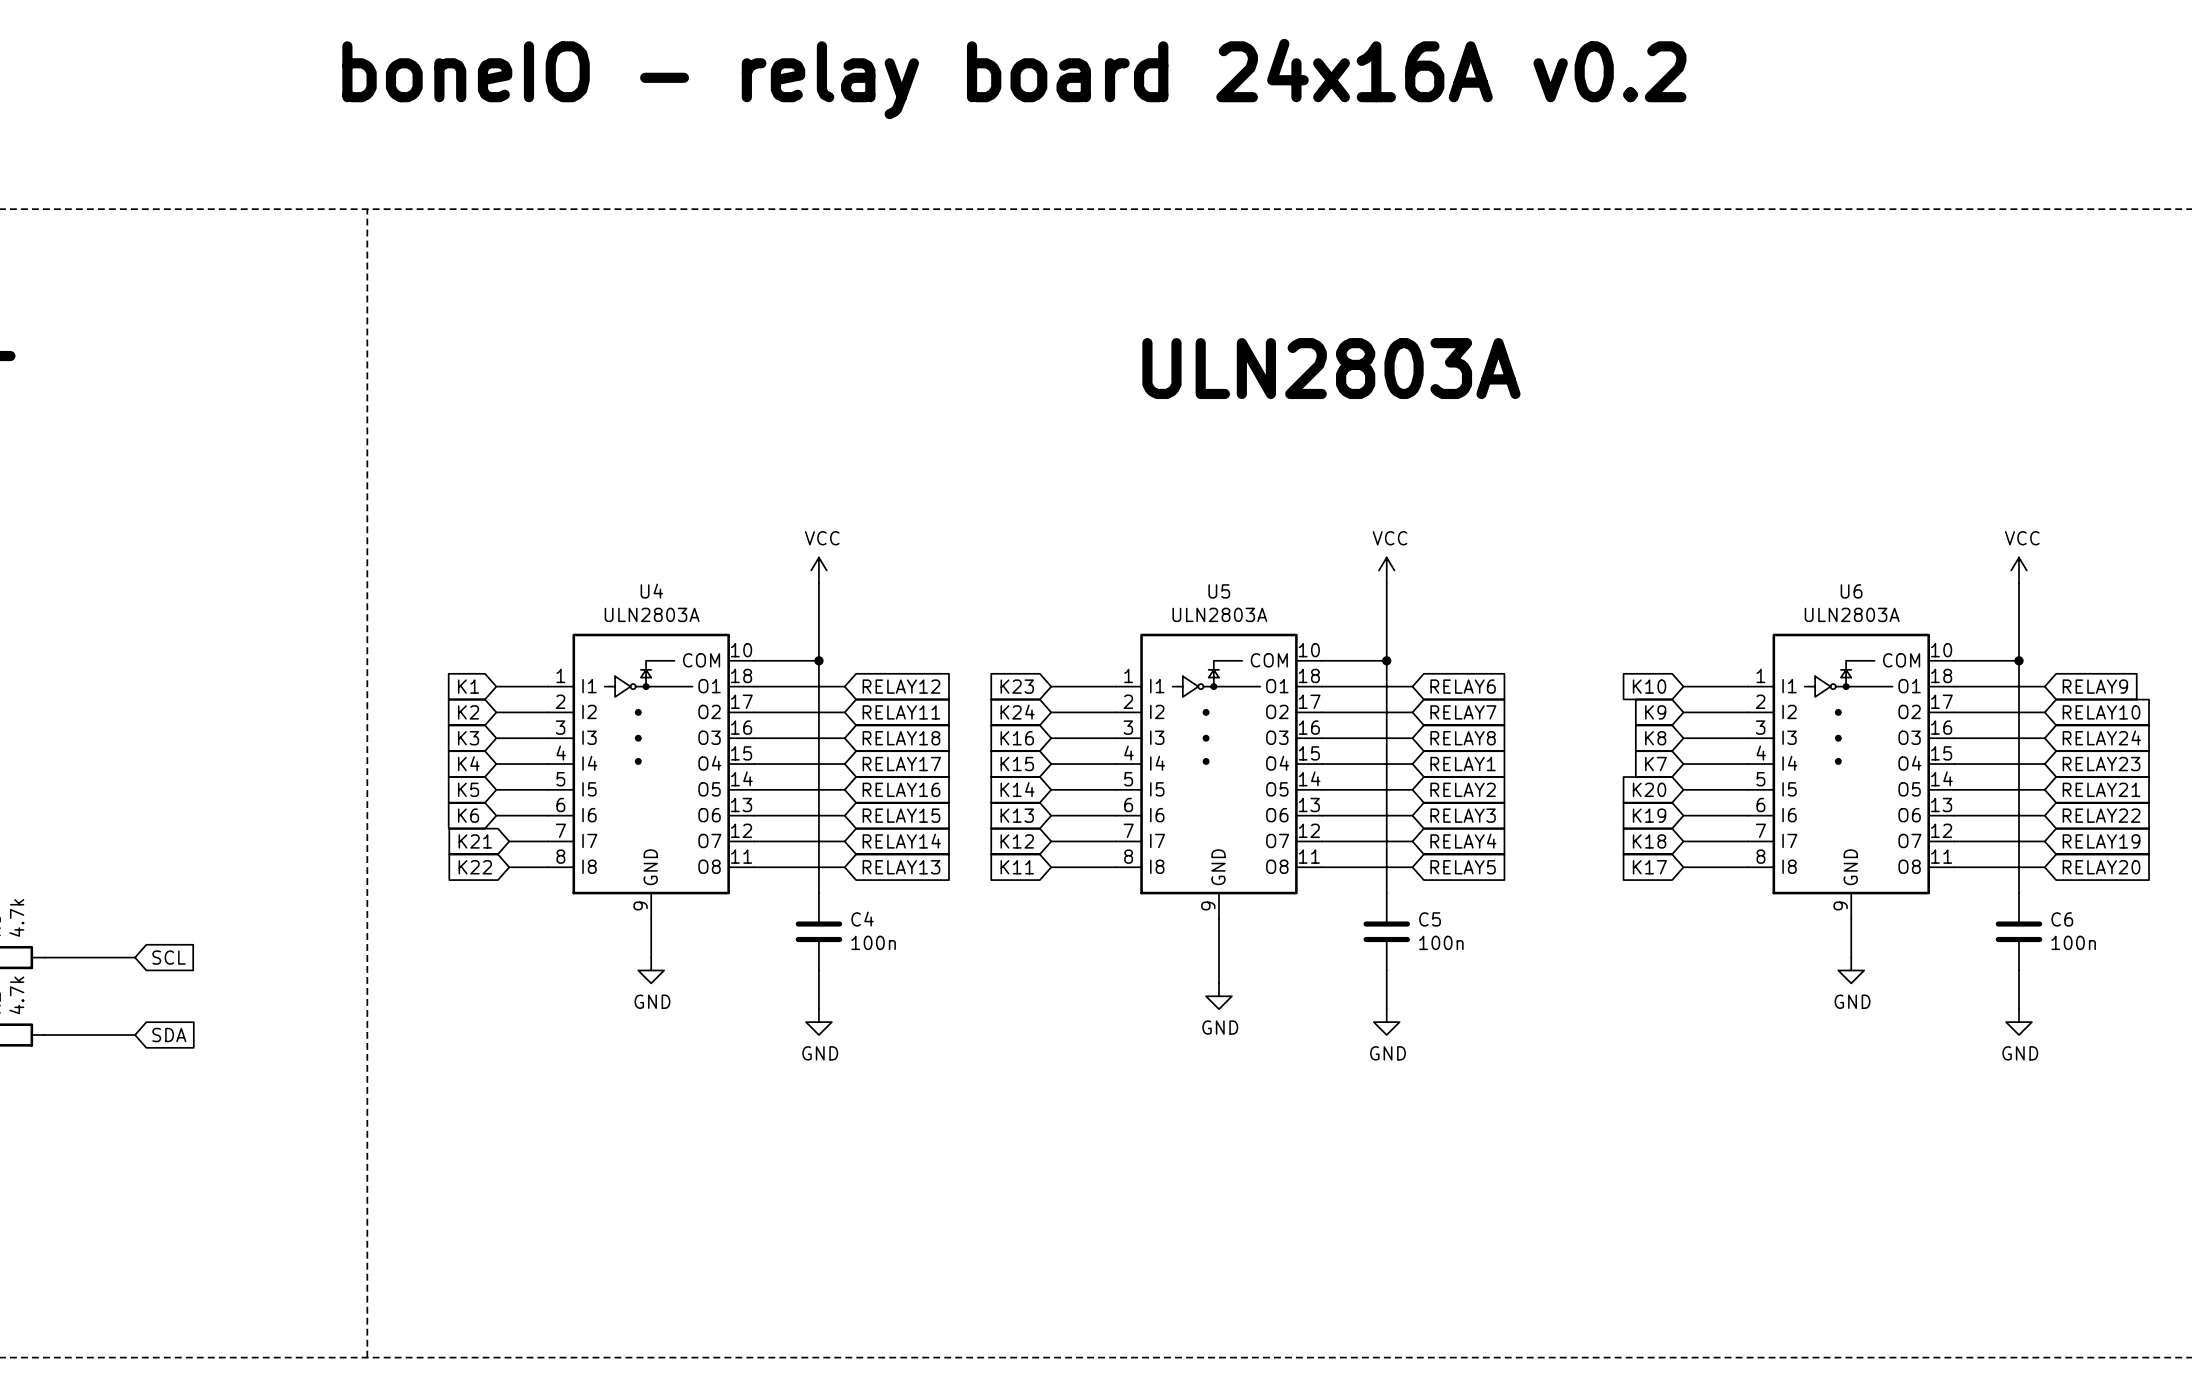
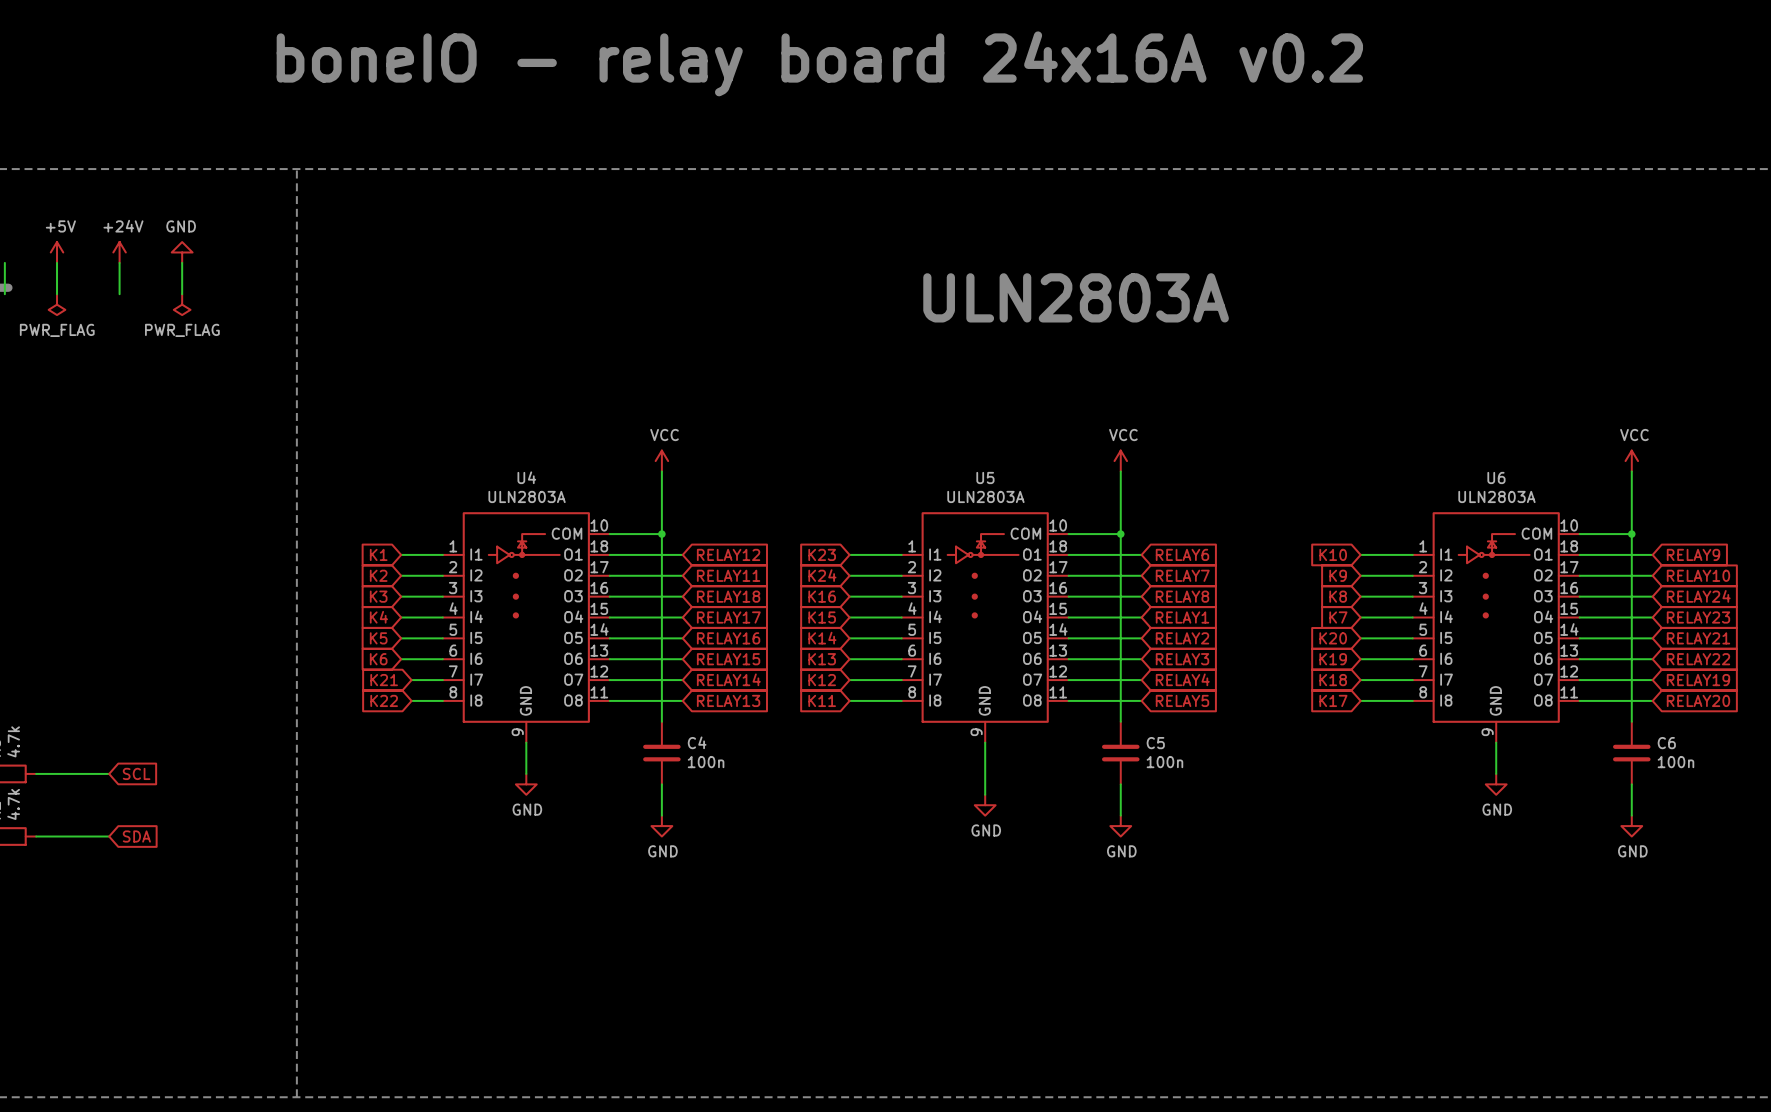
power symbol: none -> +5V (57, 252)
power symbol: none -> +24V (119, 252)
power symbol: none -> GND (182, 252)
wire: none -> (4, 262) (4, 294)
wire: none -> (57, 262) (57, 294)
wire: none -> (119, 262) (119, 294)
wire: none -> (182, 262) (182, 294)
power symbol: none -> PWR_FLAG (57, 304)
power symbol: none -> PWR_FLAG (182, 304)

